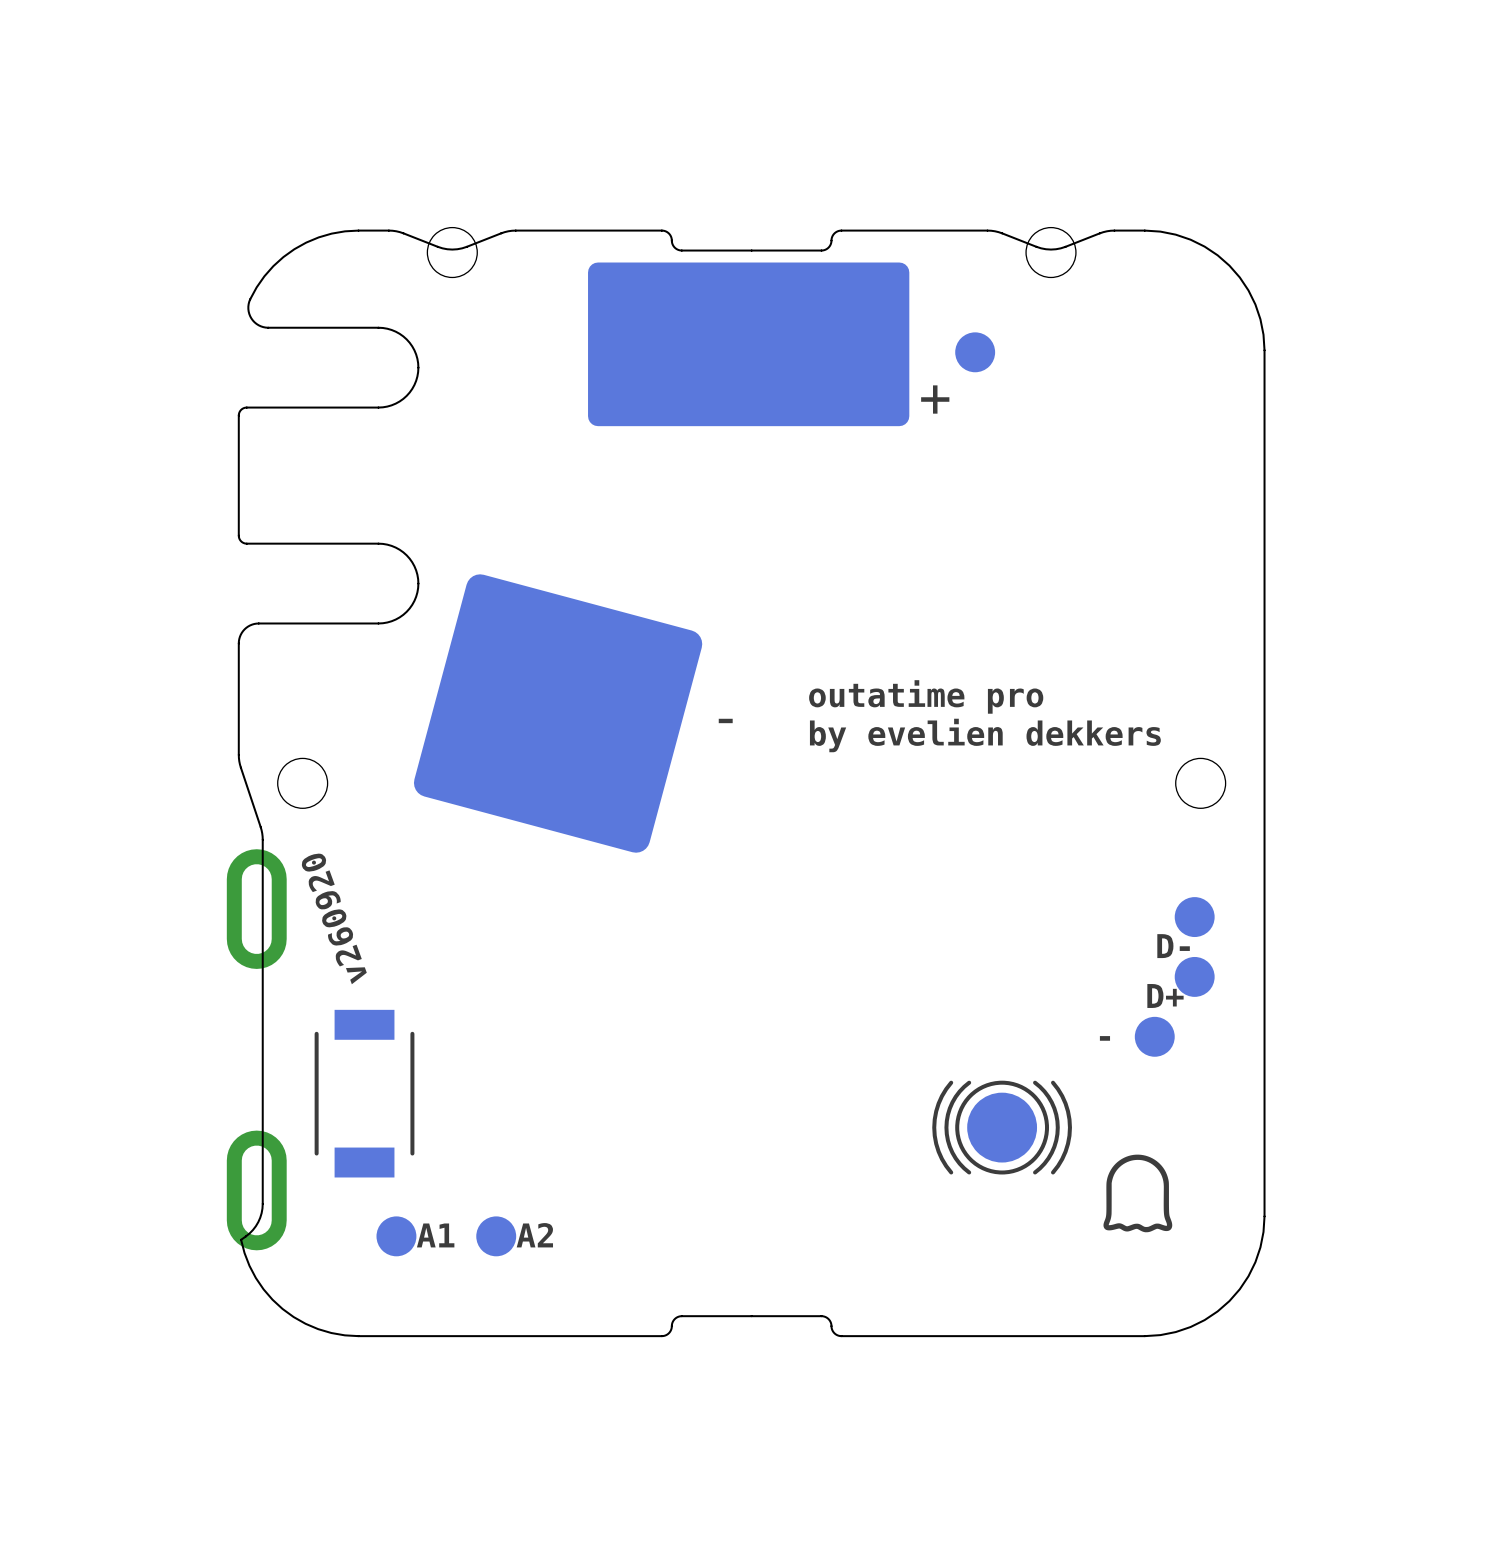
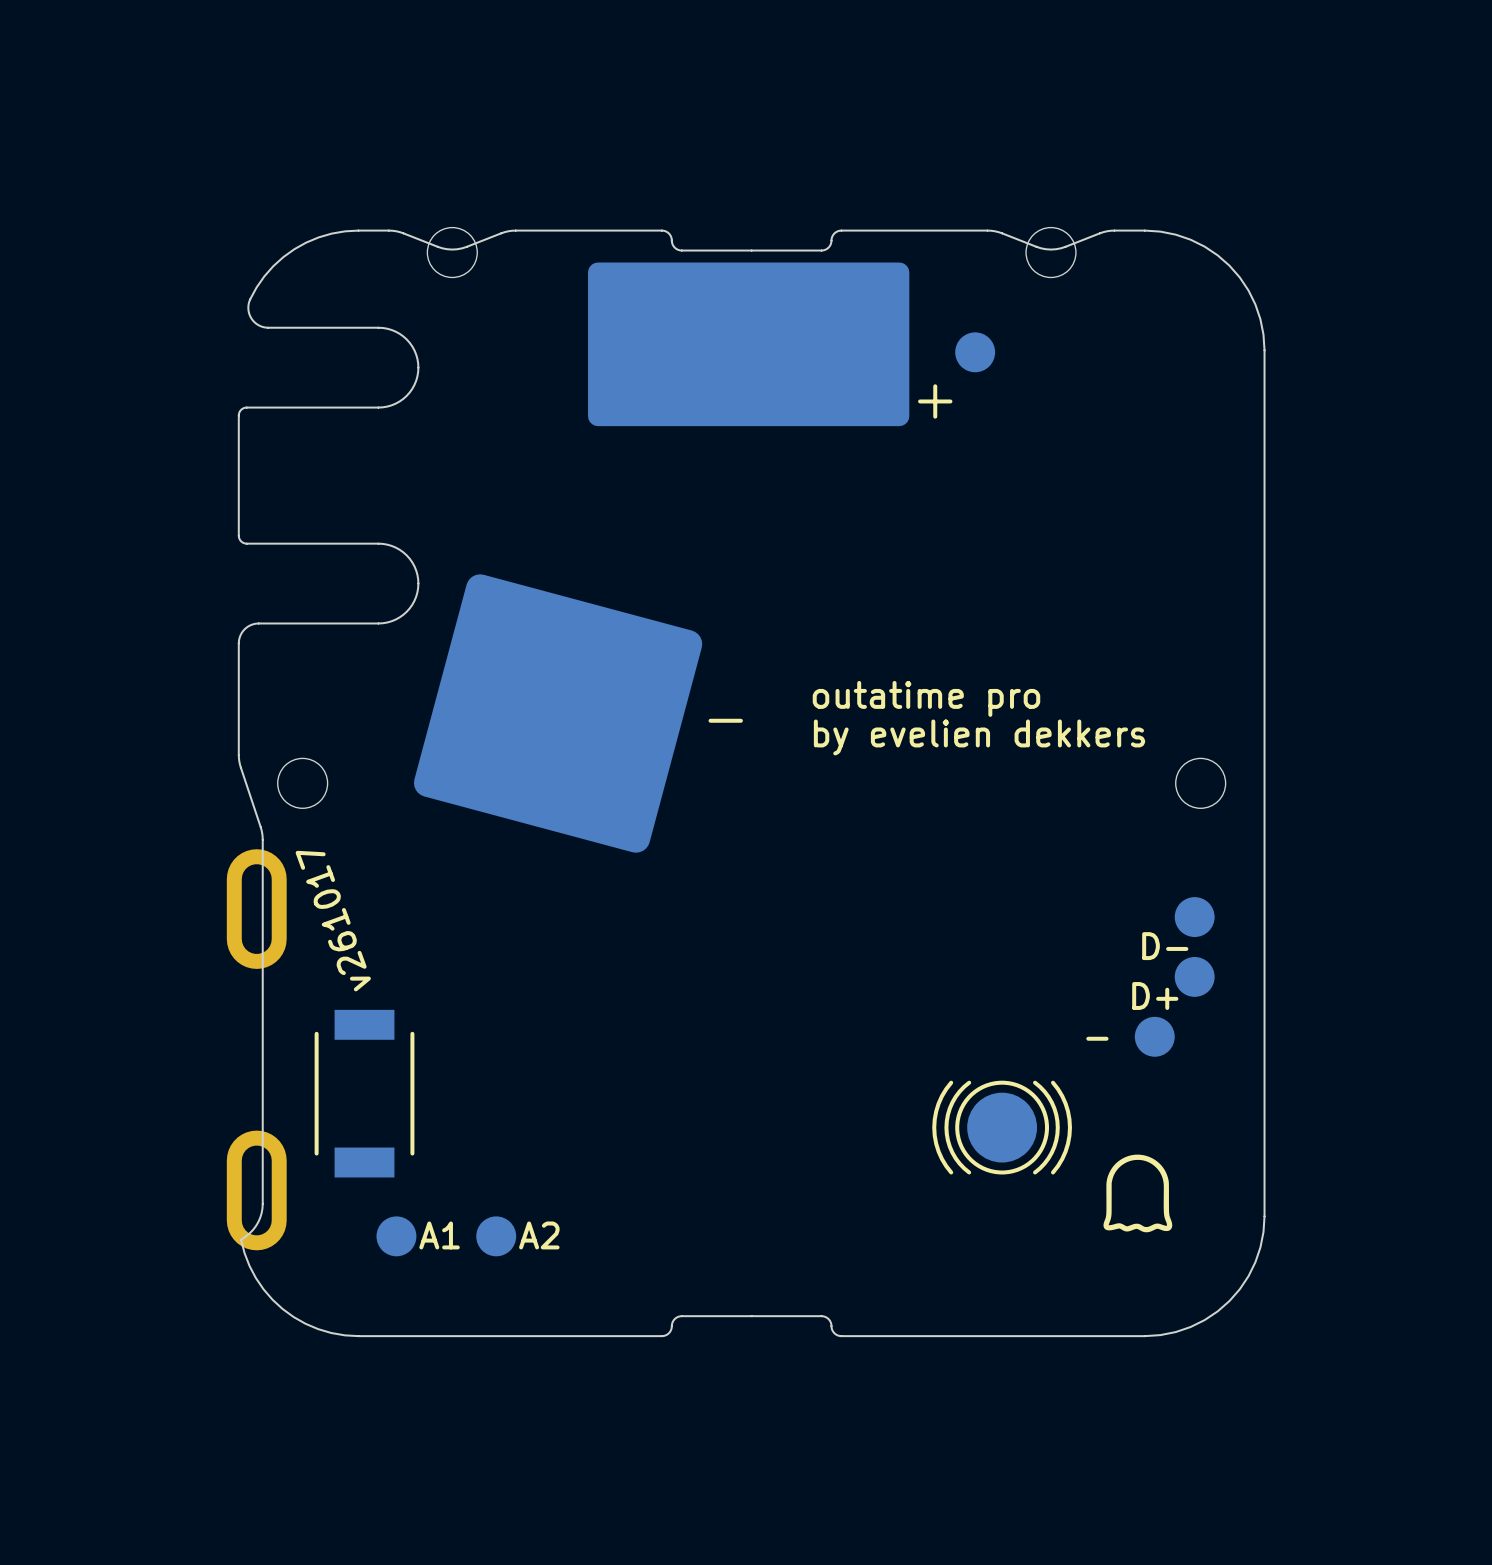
text: v260920 (333, 918) -> v261017 (333, 921)

